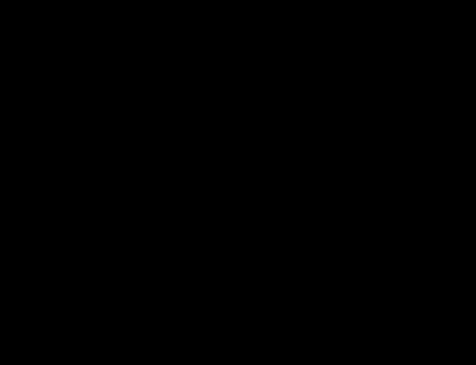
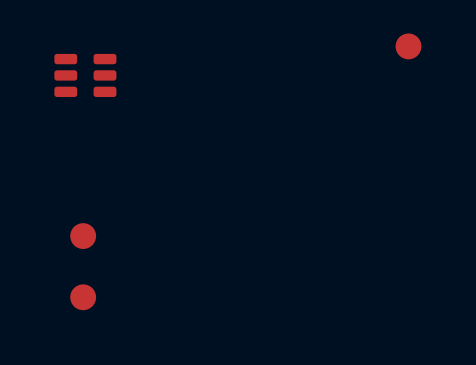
part: none -> (408, 46)
part: none -> (85, 75)
part: none -> (83, 236)
part: none -> (83, 297)

